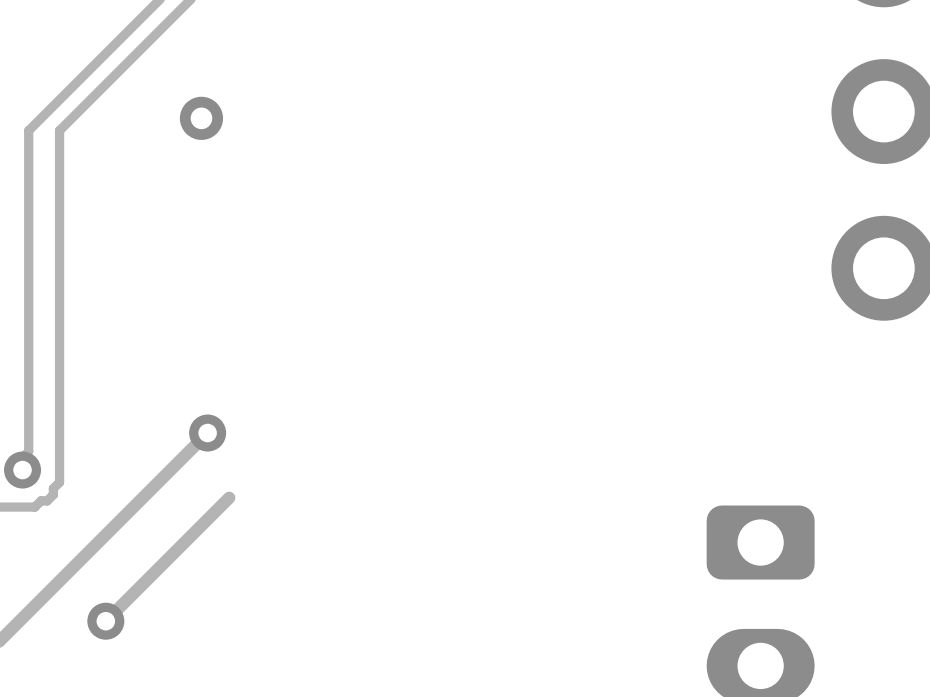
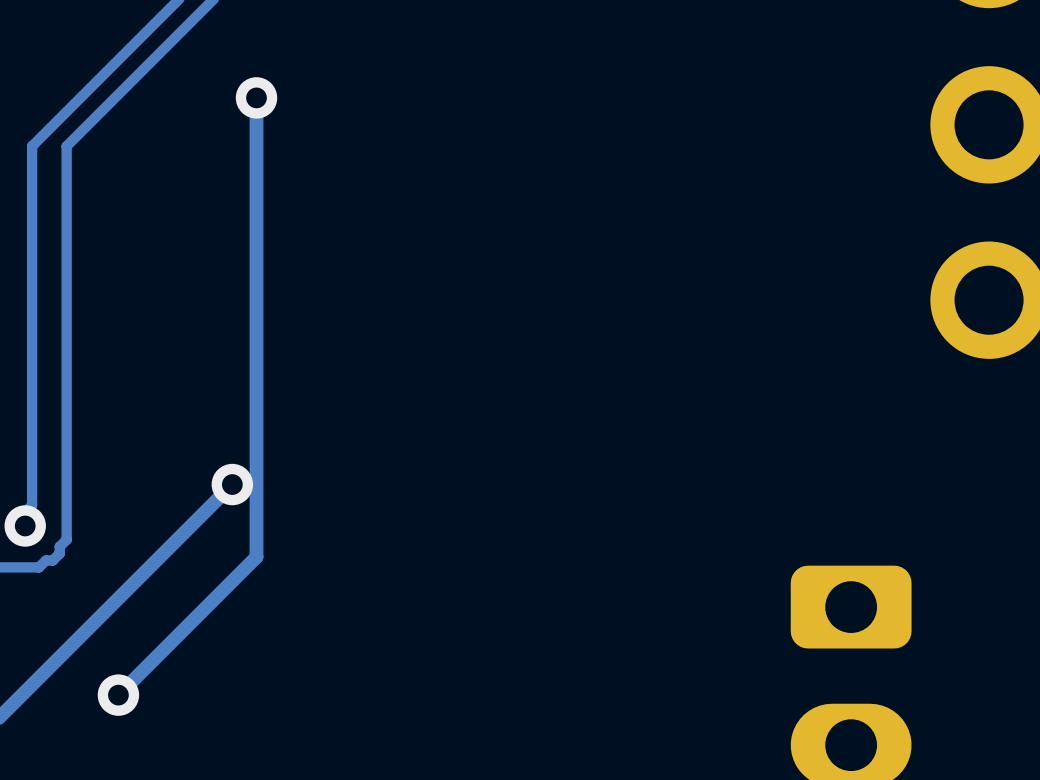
track: none -> (256, 97) (256, 557)
via position: (201, 118) -> (256, 97)

